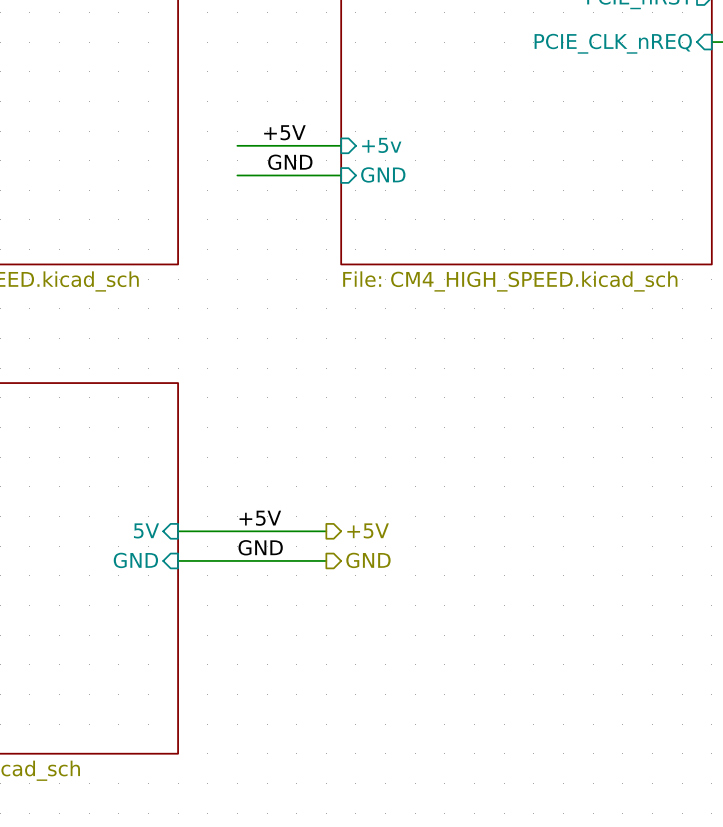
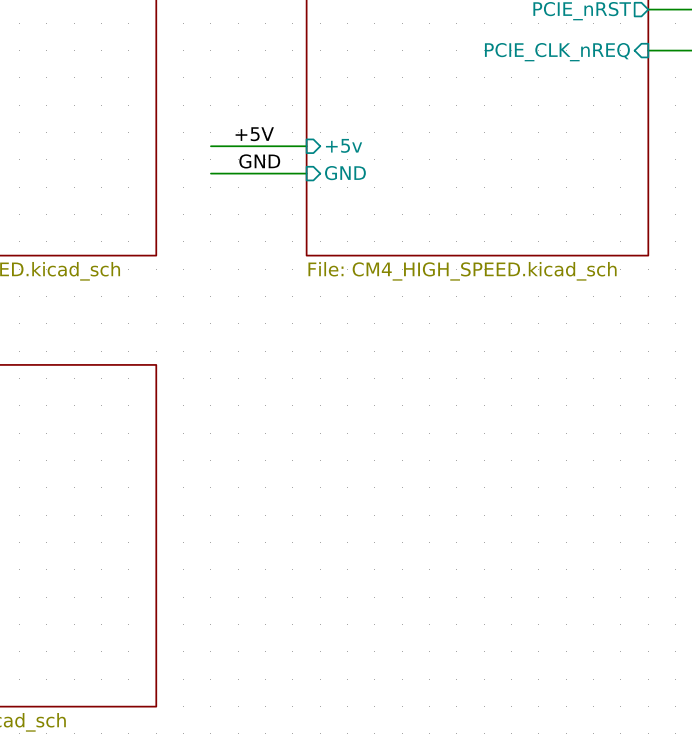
label: +5V (260, 518) -> none
sheet pin: 5V (146, 530) -> none
hierarchical label: +5V (368, 530) -> none
wire: (178, 531) (326, 531) -> none
label: GND (260, 547) -> none
sheet pin: GND (135, 560) -> none
wire: (178, 560) (326, 560) -> none
hierarchical label: GND (368, 560) -> none

